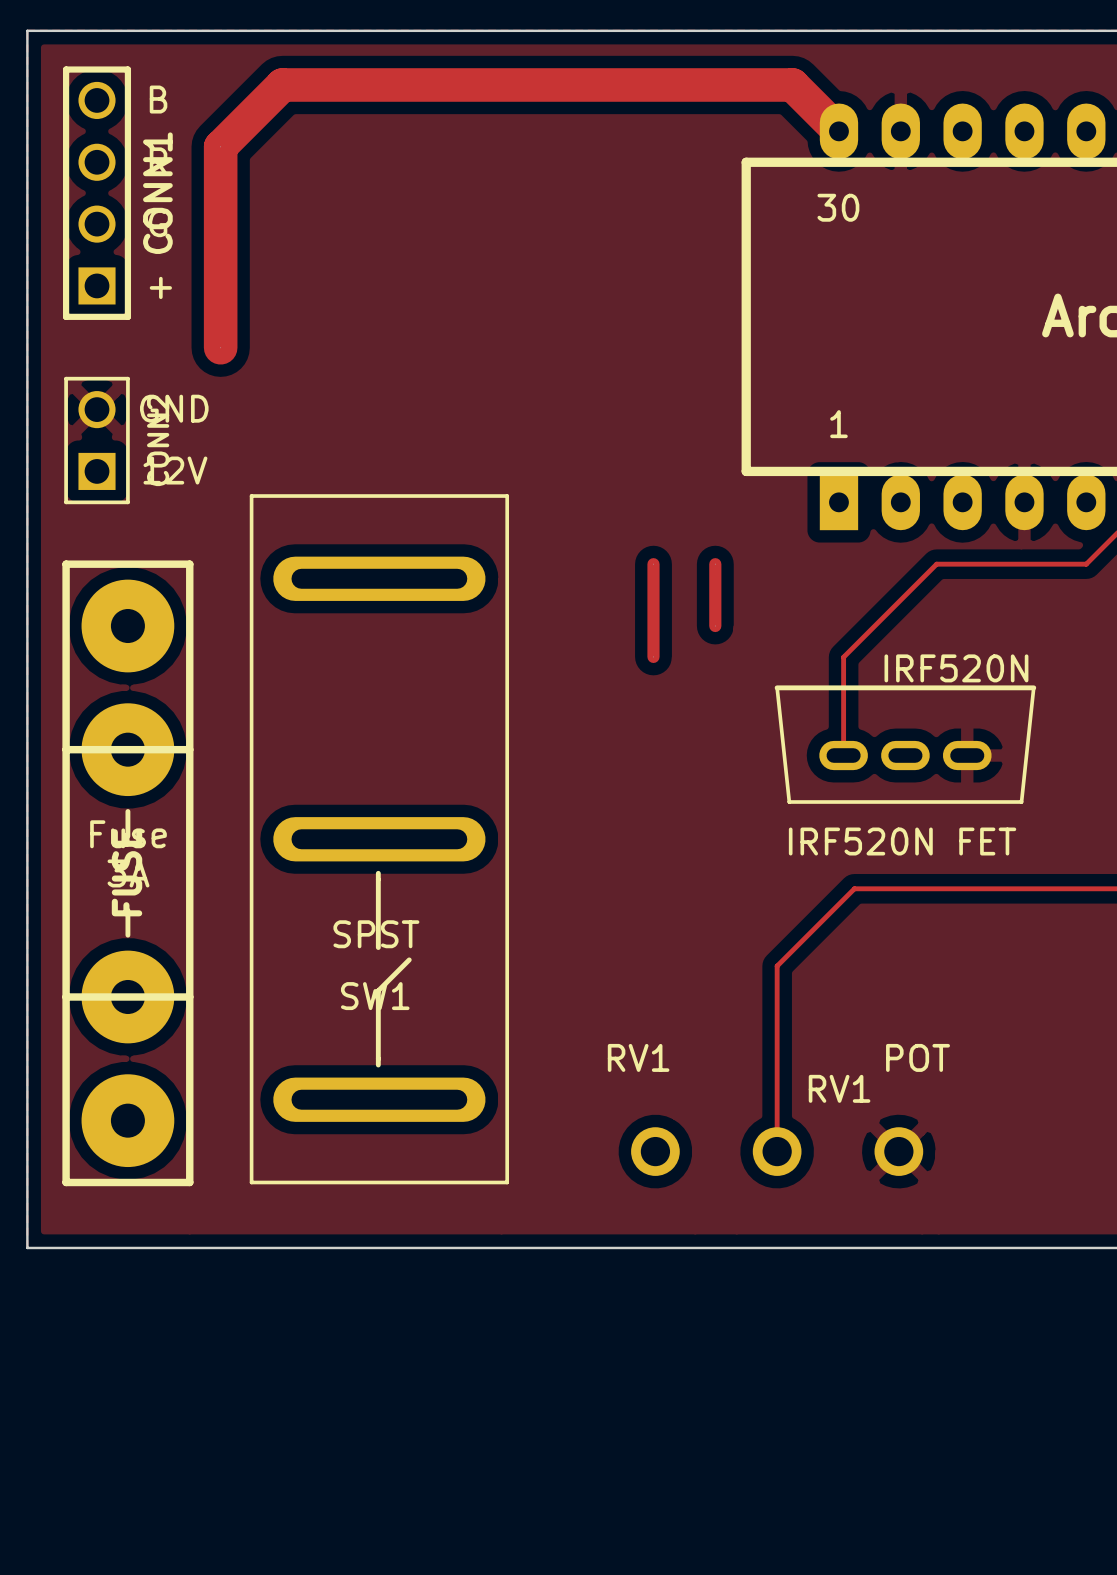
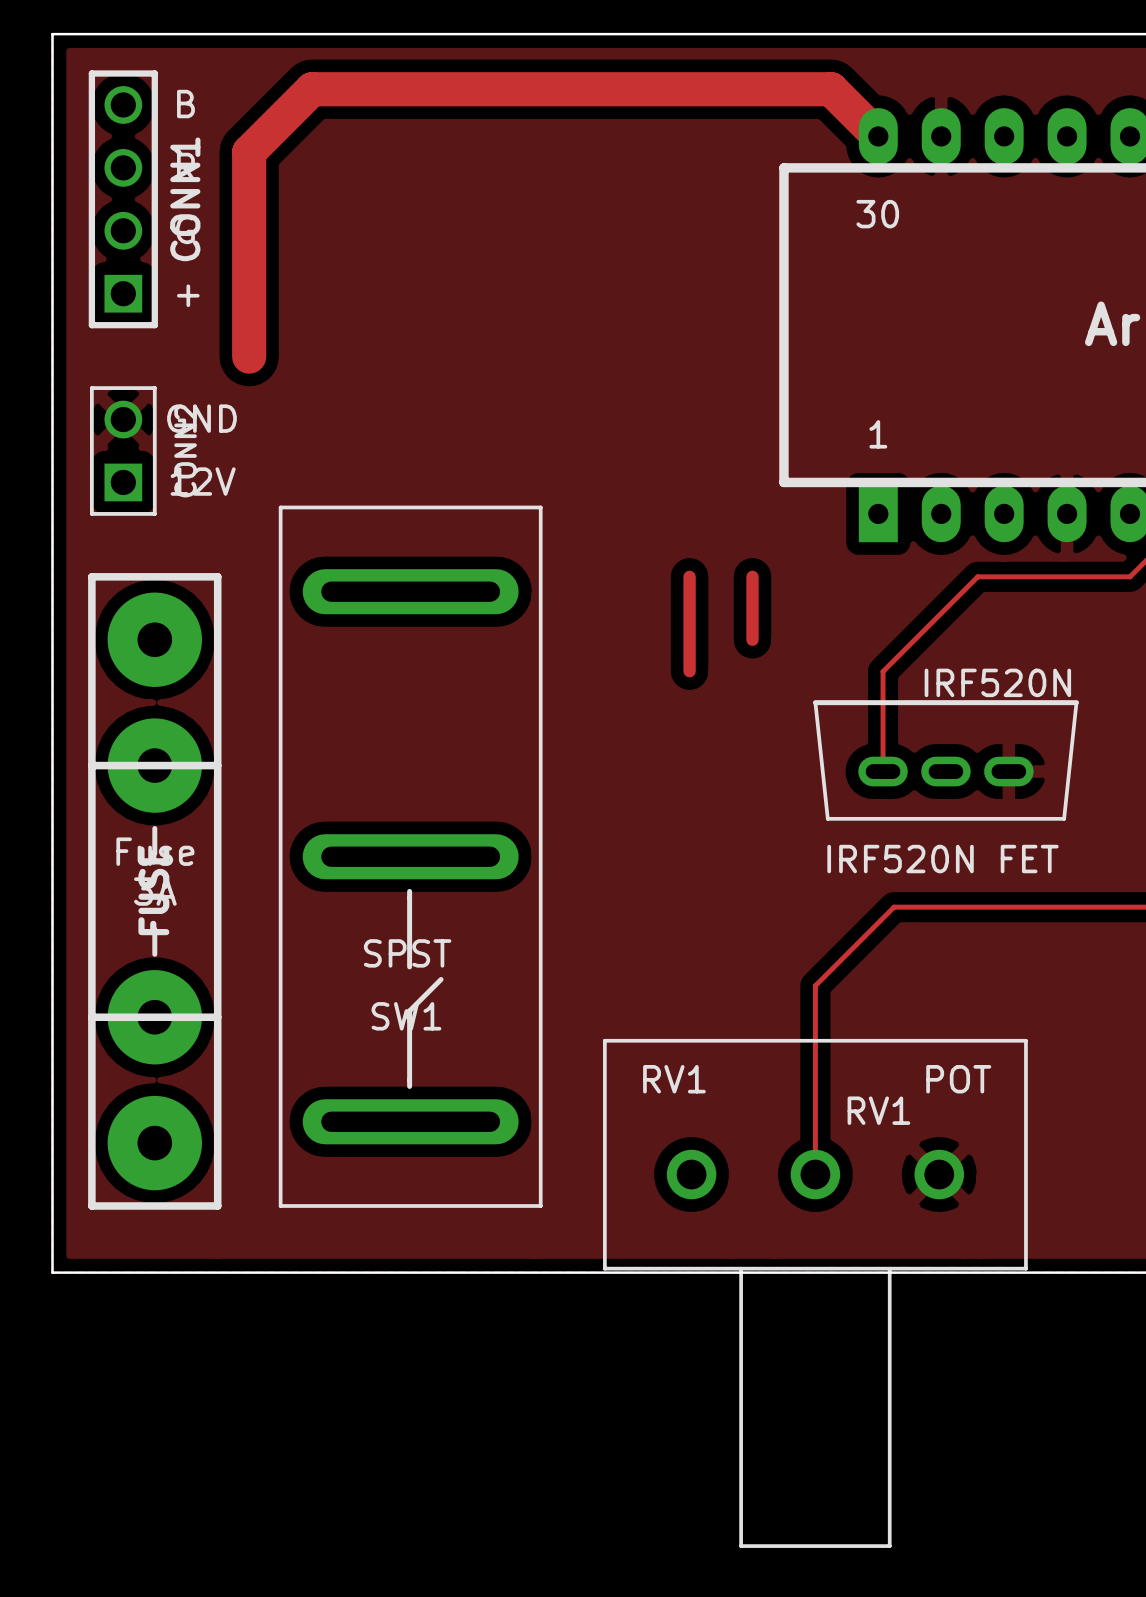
RV1 footprint: [631, 1127, 924, 1176] -> [603, 1038, 1028, 1548]

